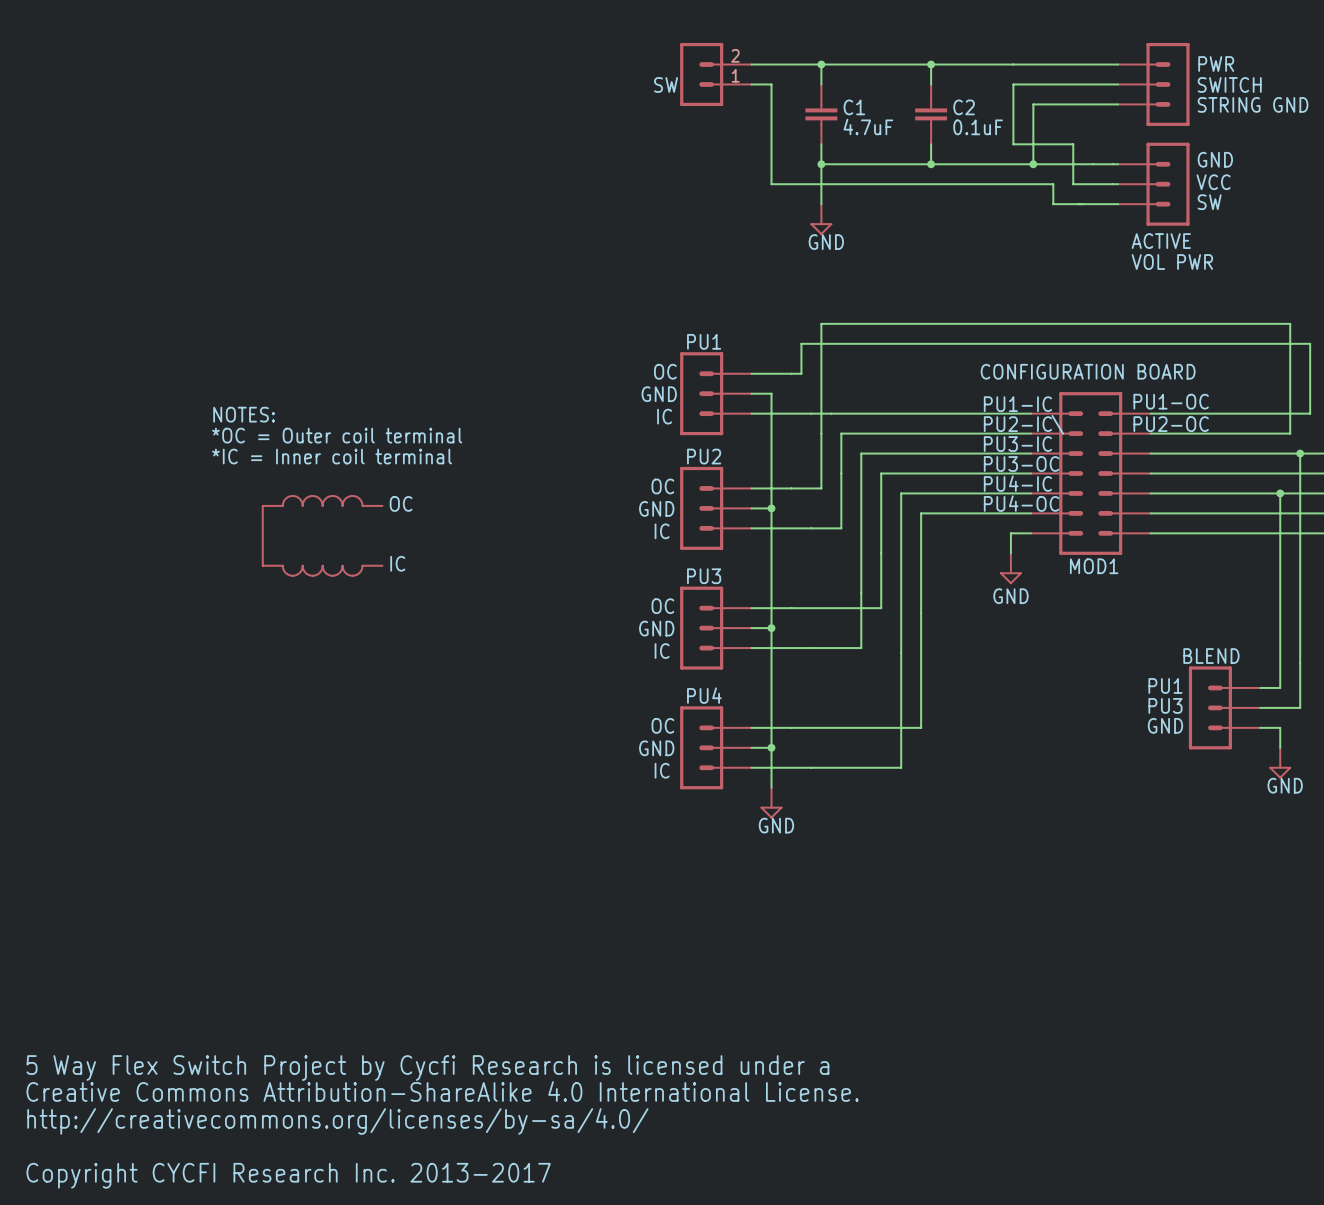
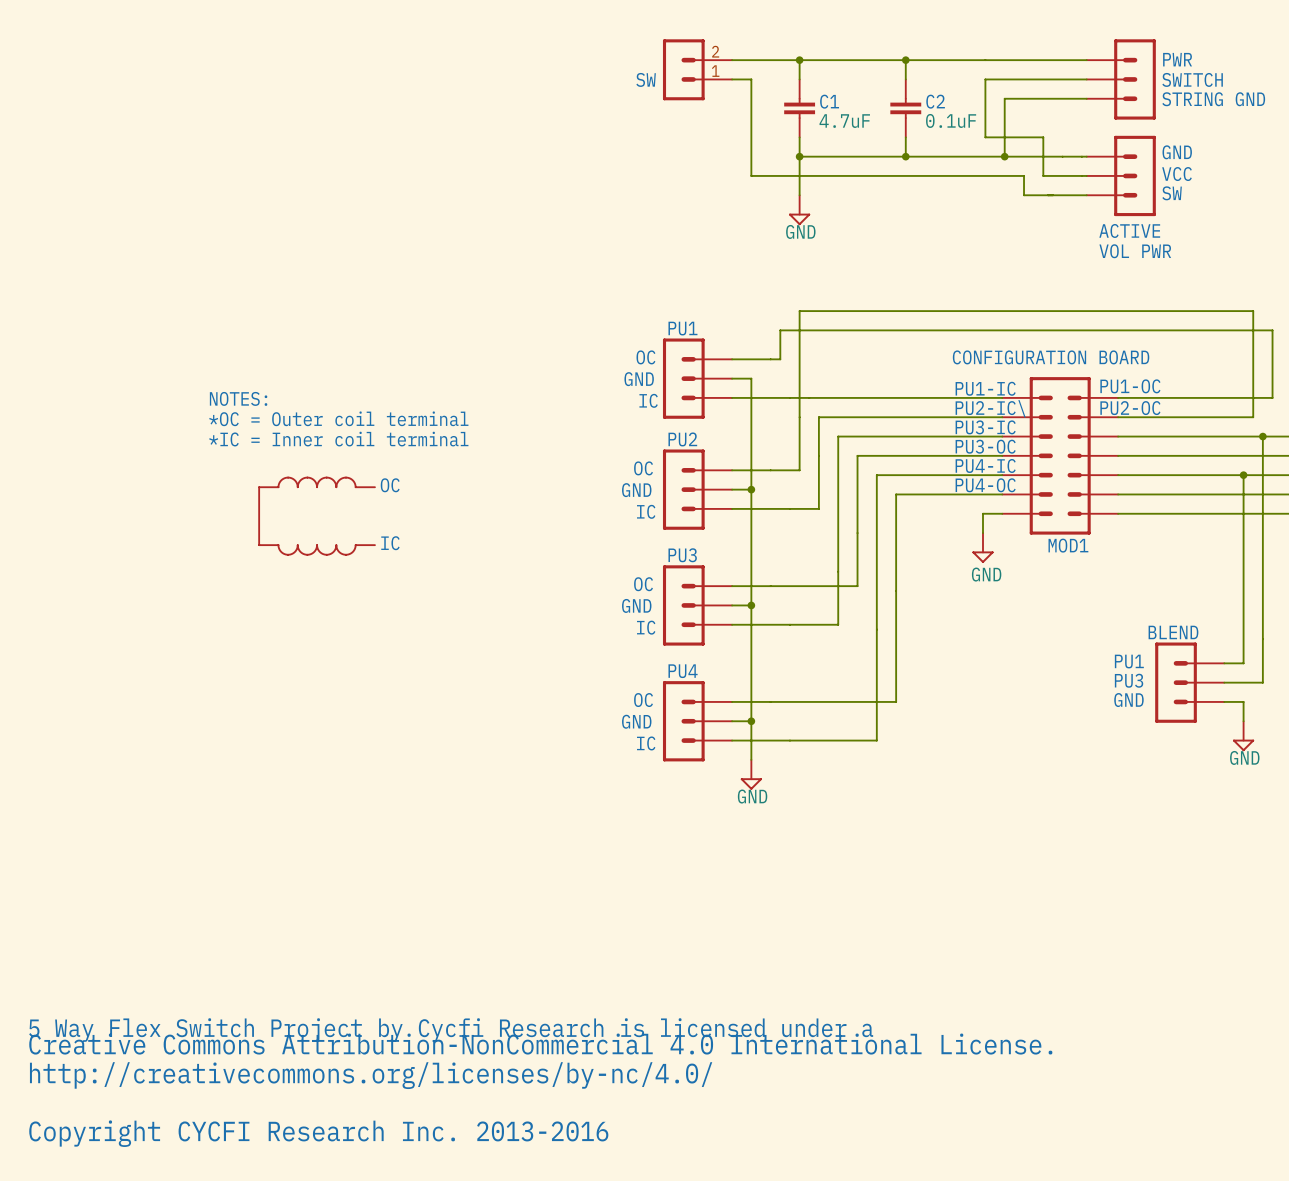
text: Creative Commons Attribution-ShareAlike 4.0 International License. (442, 1091) -> Creative Commons Attribution-NonCommercial 4.0 International License. (540, 1044)
text: http://creativecommons.org/licenses/by-sa/4.0/ (337, 1121) -> http://creativecommons.org/licenses/by-nc/4.0/ (371, 1075)
text: Copyright CYCFI Research Inc. 2013-2017 (288, 1175) -> Copyright CYCFI Research Inc. 2013-2016 (318, 1133)

